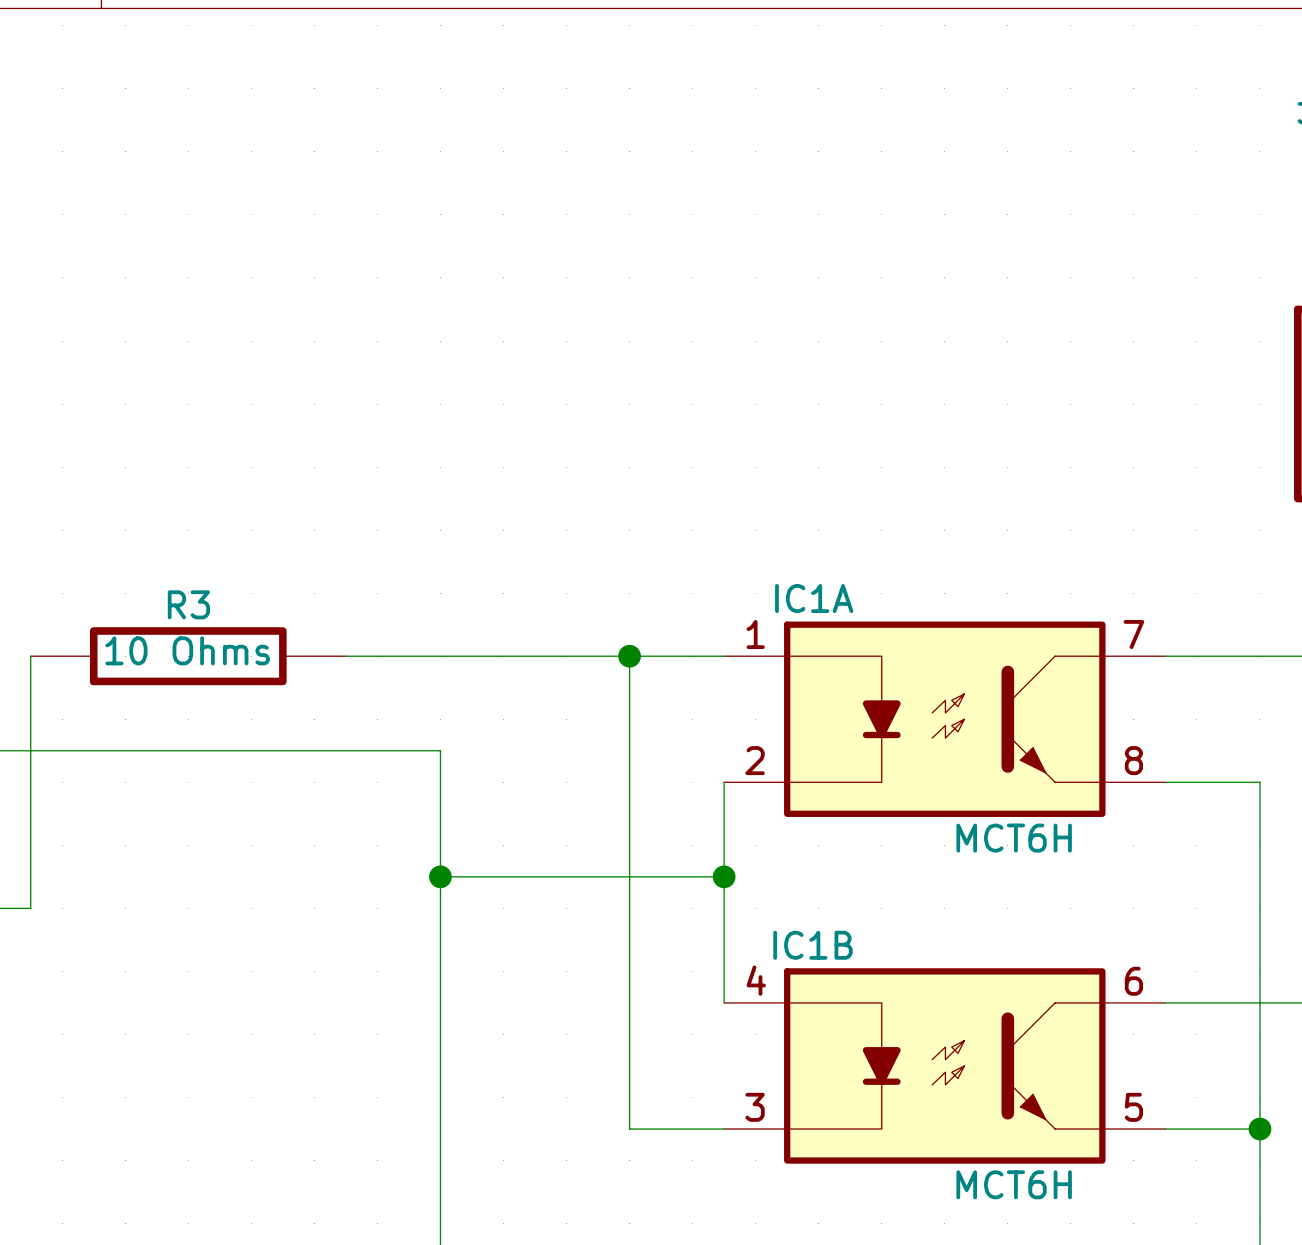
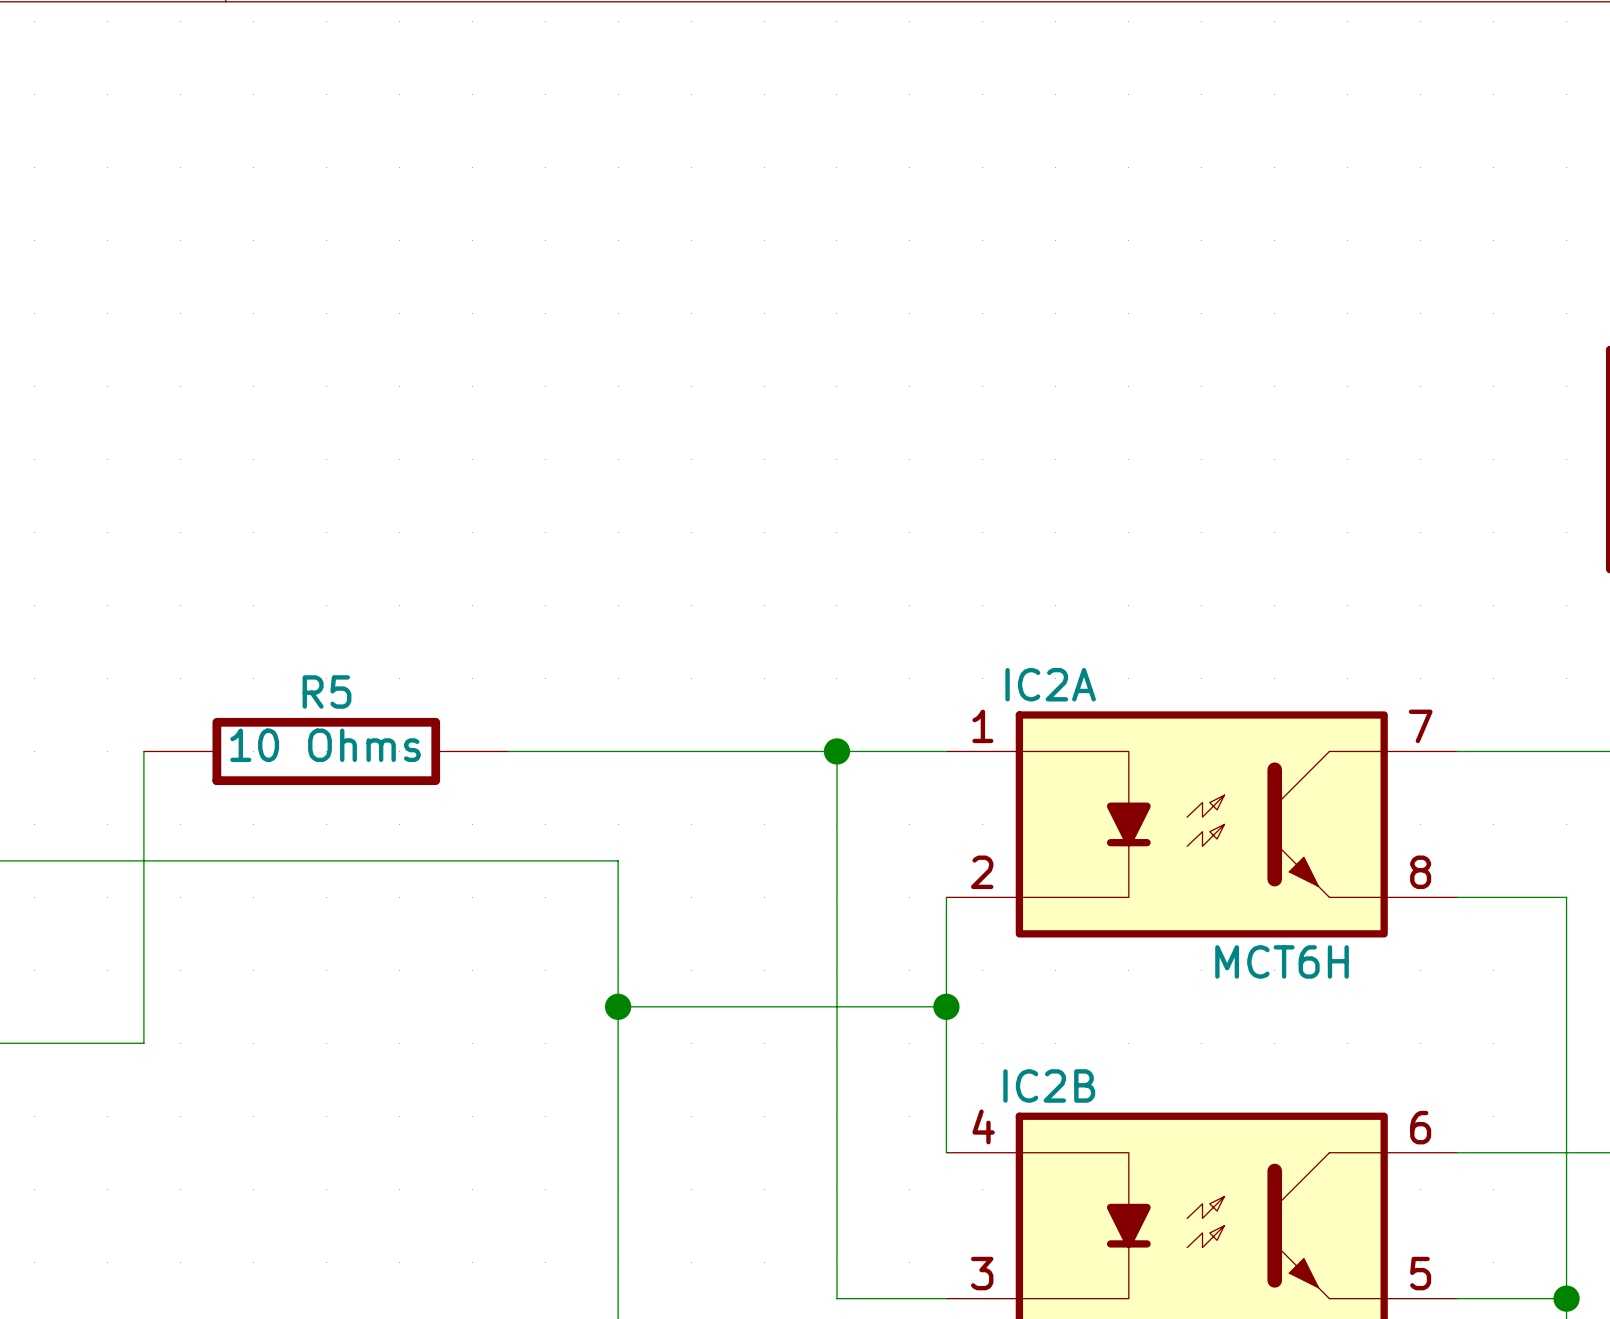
IC1A name: IC1A (814, 598) -> IC2A (1050, 684)
R3 name: R3 (188, 604) -> R5 (326, 692)
IC1B name: IC1B (813, 945) -> IC2B (1049, 1085)

